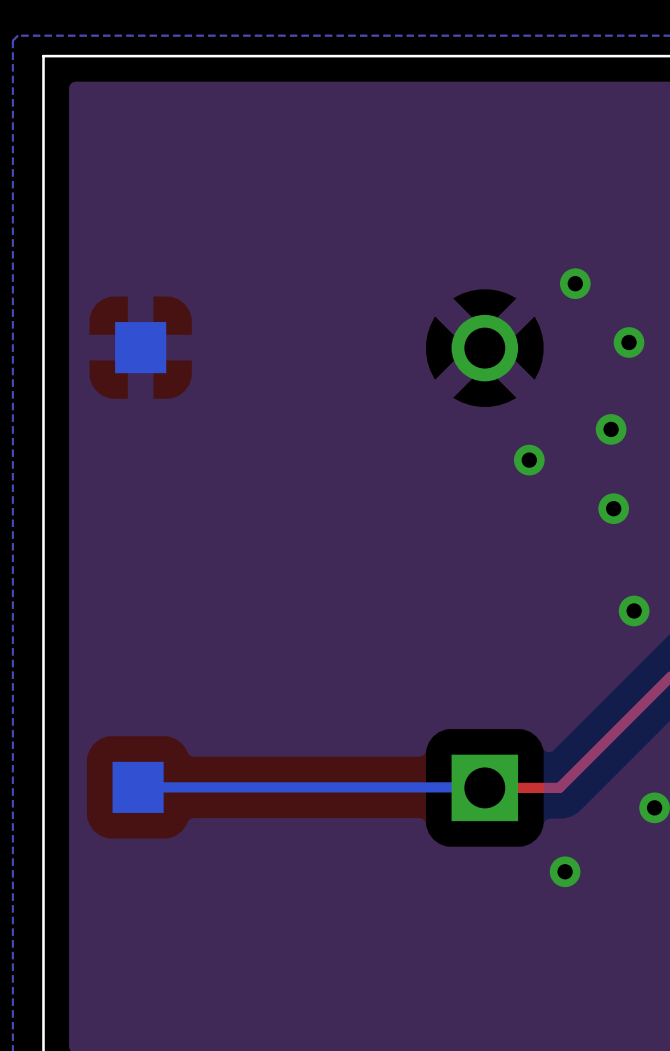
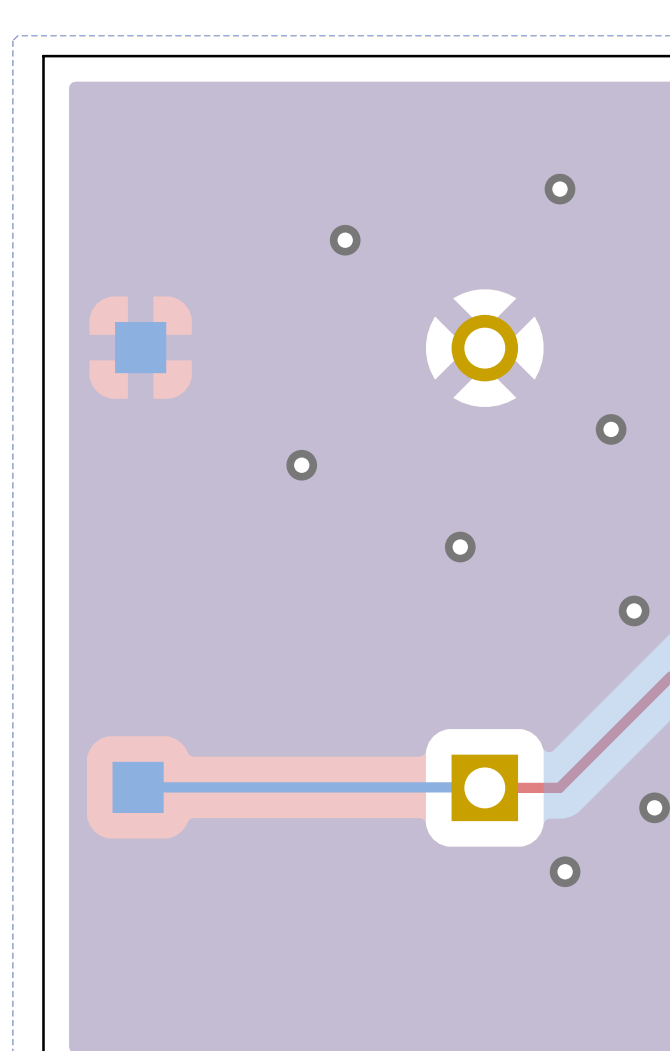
via: none -> (559, 189)
via: none -> (345, 240)
via: (575, 283) -> none
via: (629, 342) -> none
via: (529, 460) -> none
via: none -> (301, 465)
via: (613, 508) -> none
via: none -> (460, 547)

